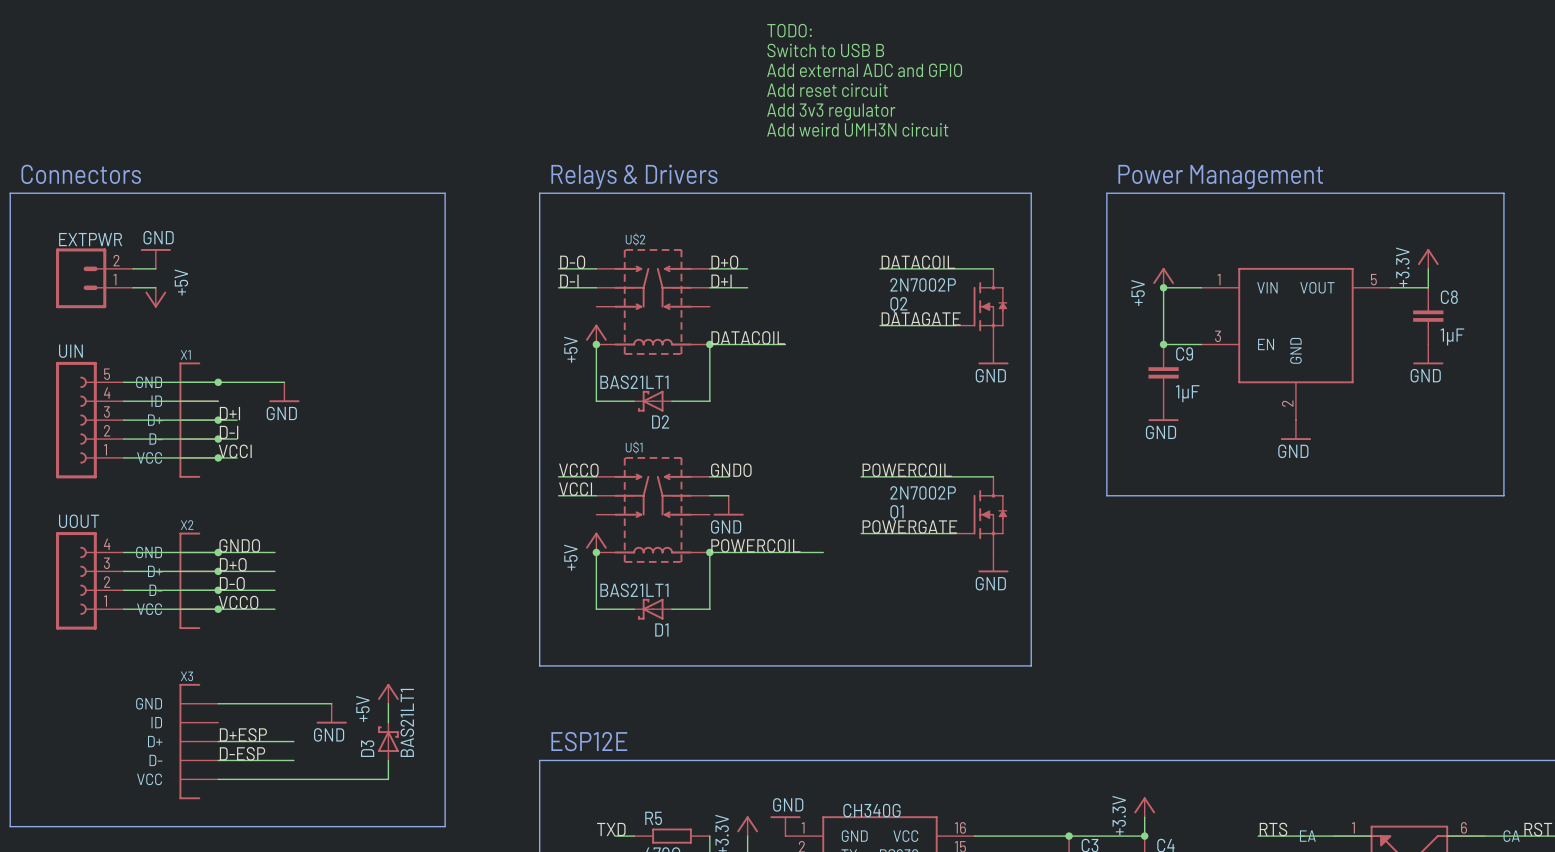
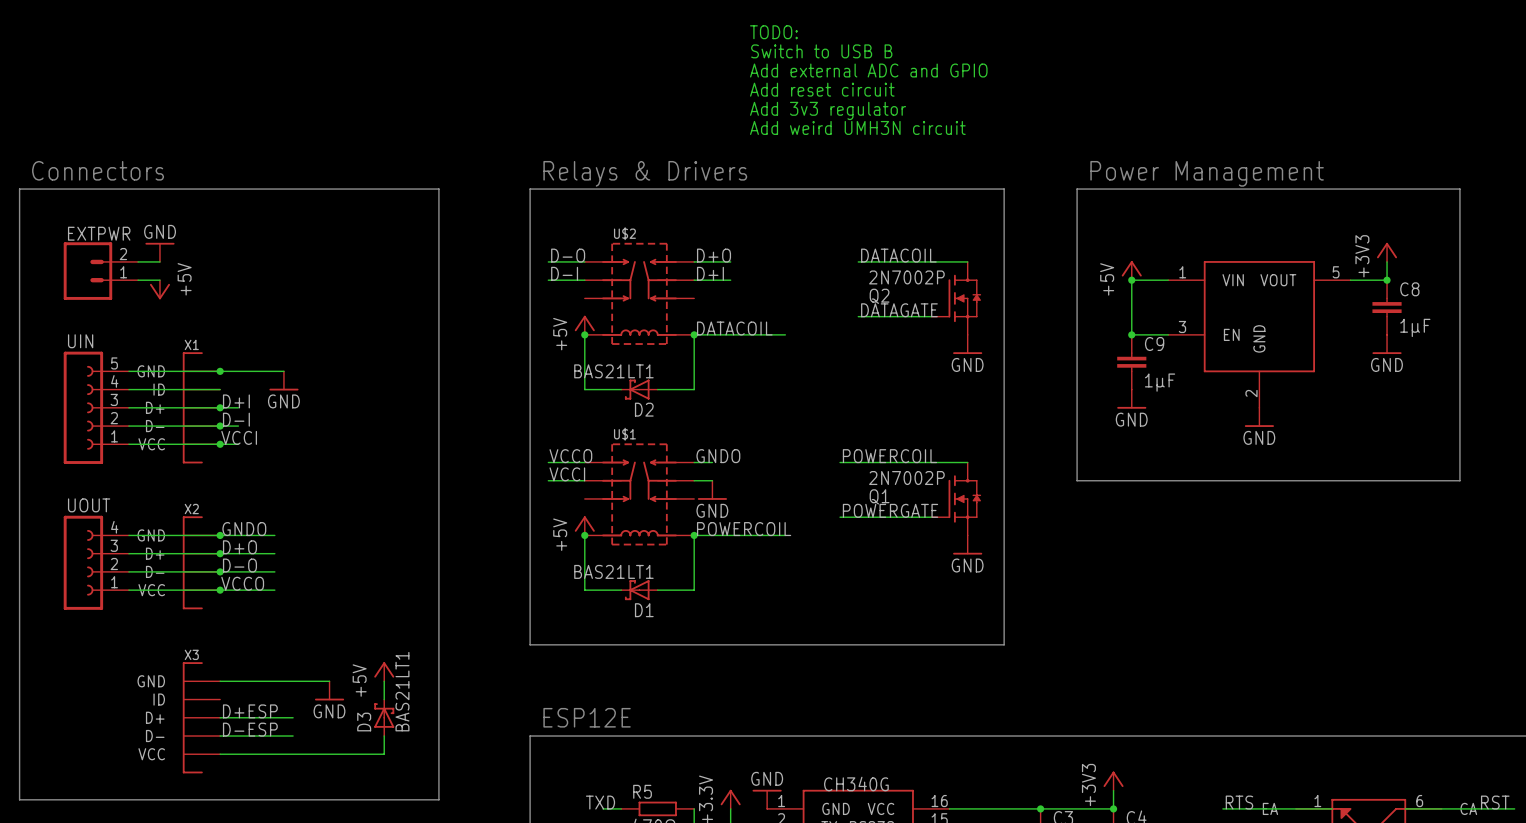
power symbol: +3.3V (1428, 258) -> +3V3 (1387, 252)
junction: none -> (1387, 280)
wire: none -> (767, 334) (785, 334)
wire: (804, 552) (823, 552) -> none
power symbol: +3.3V (1144, 807) -> +3V3 (1113, 781)

